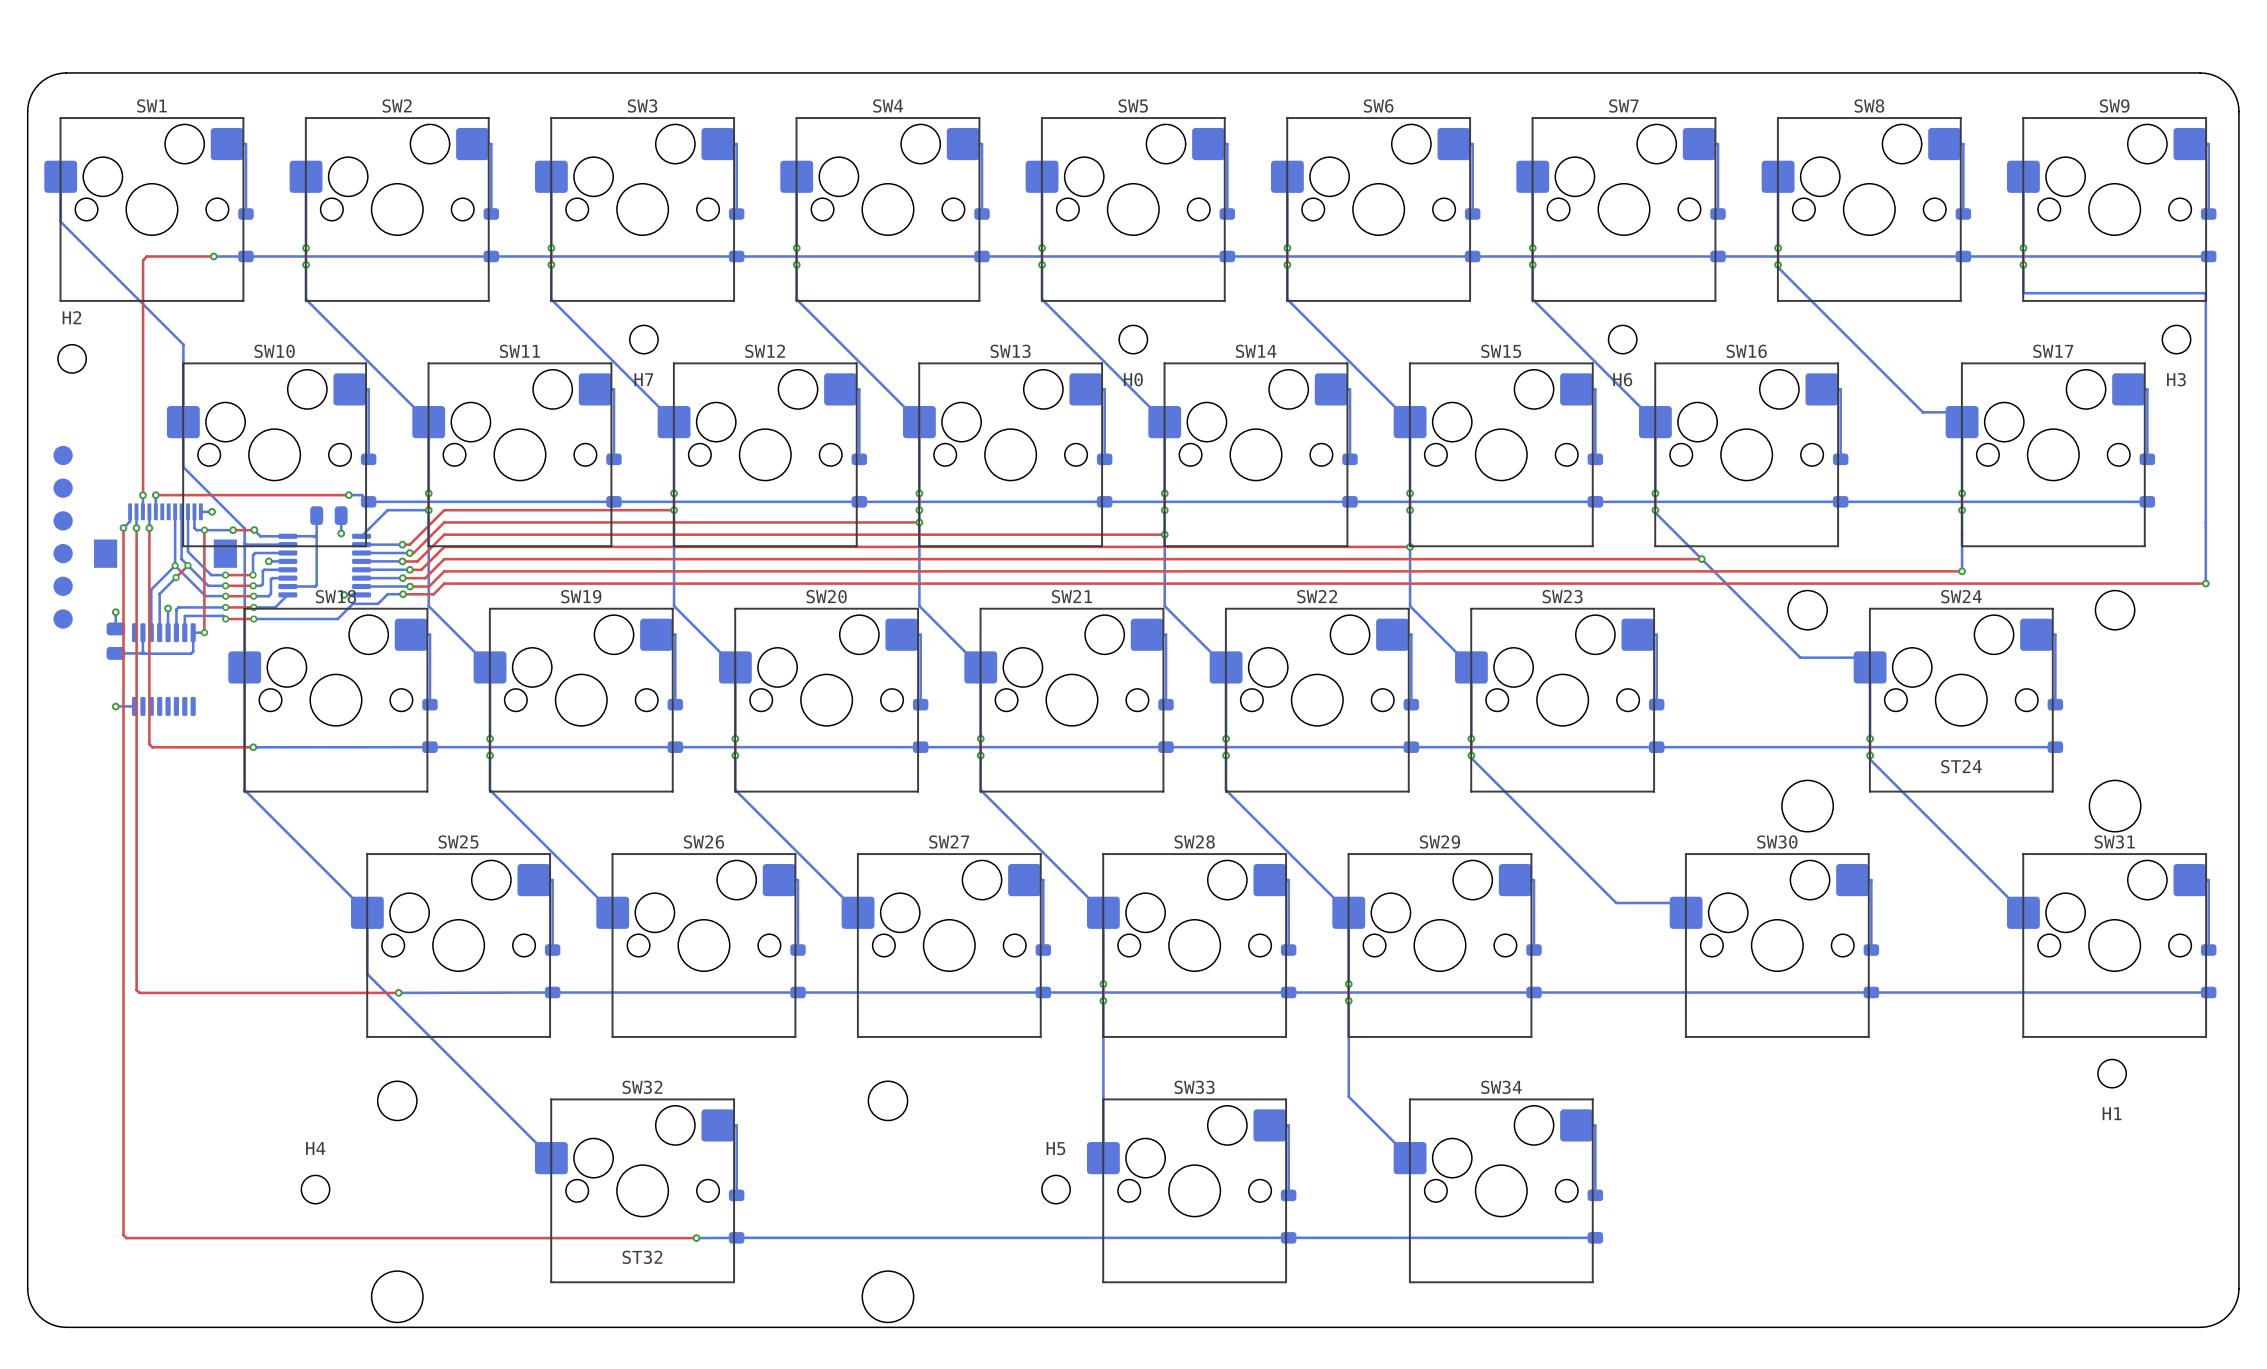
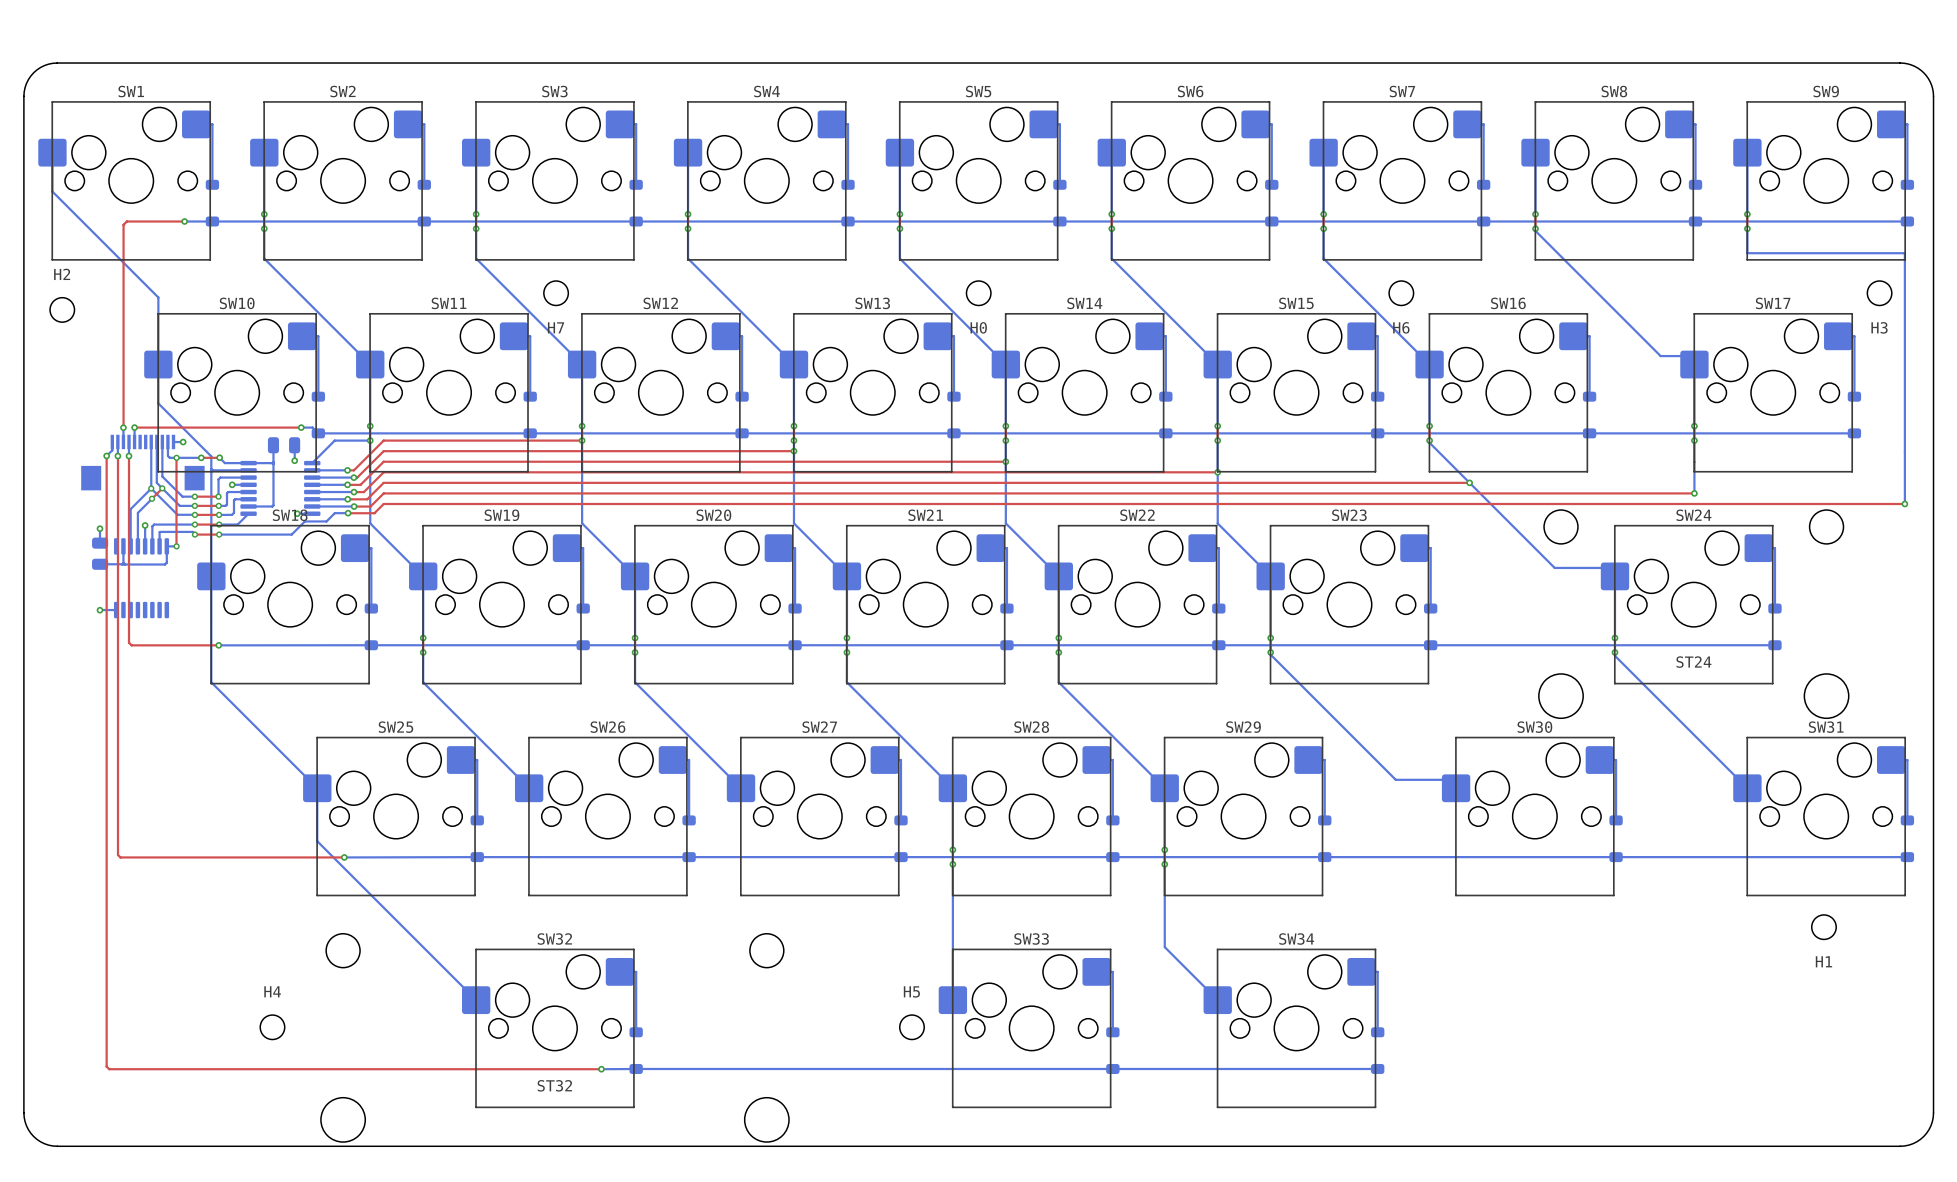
part: (63, 455) -> none
part: (63, 488) -> none
part: (63, 520) -> none
part: (63, 553) -> none
part: (63, 586) -> none
part: (63, 619) -> none

